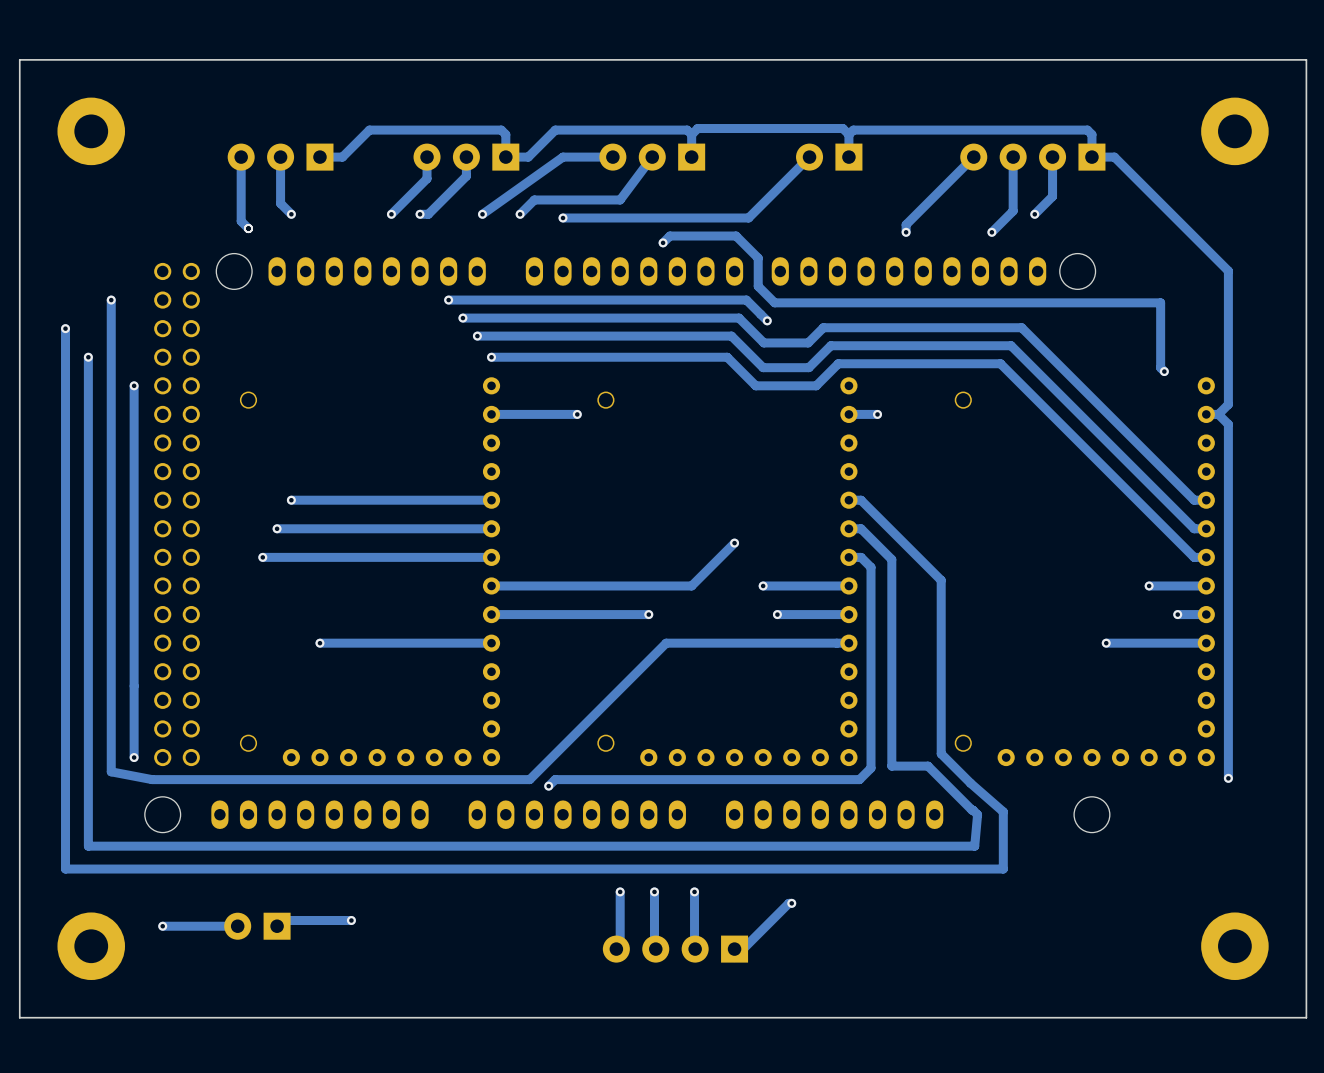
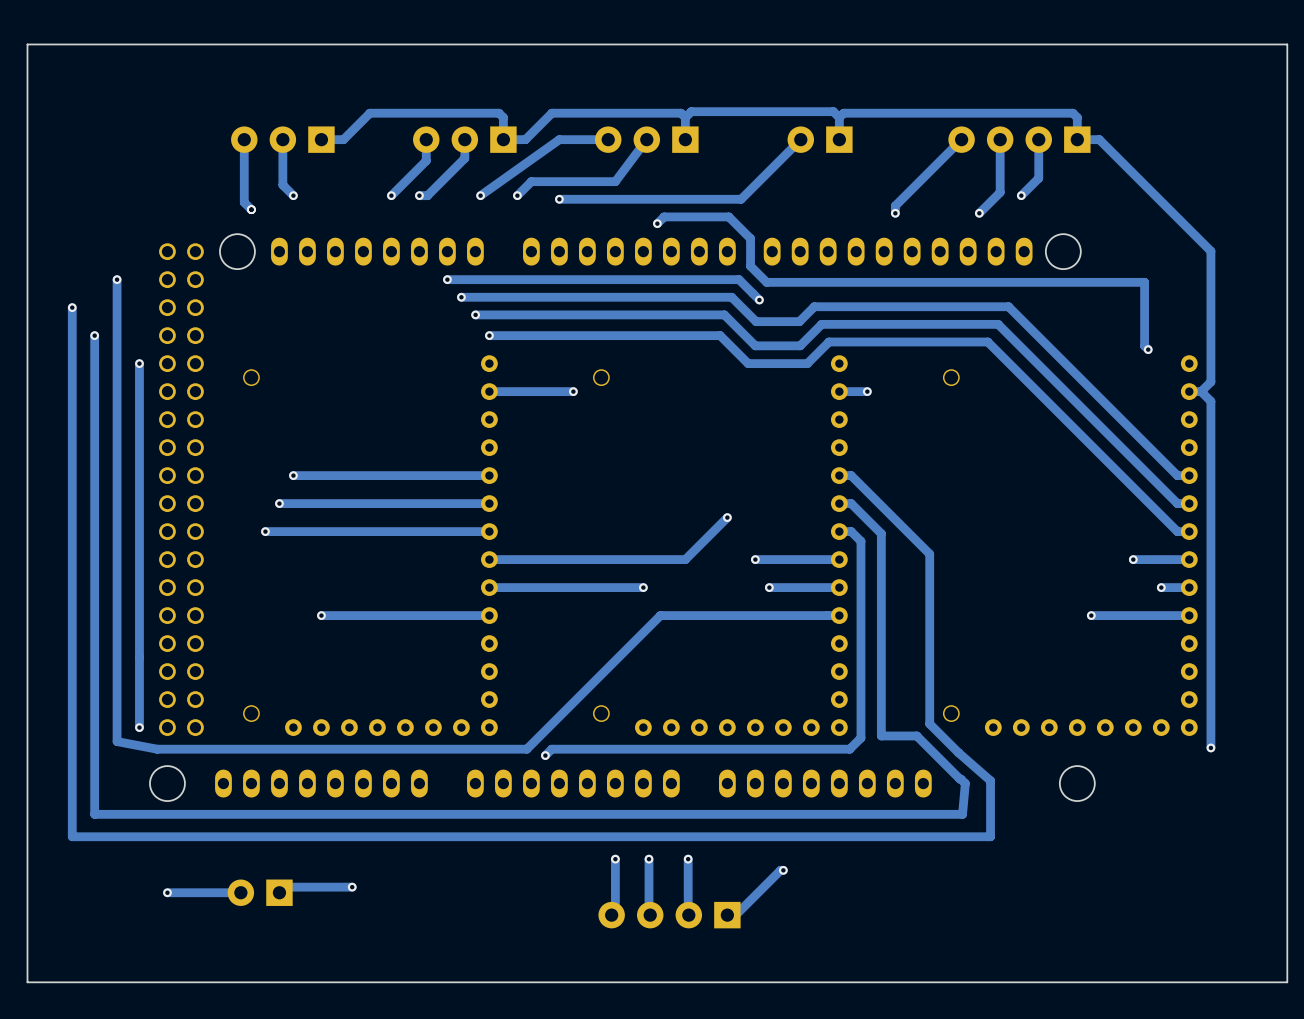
part: (91, 131) -> none
part: (1234, 131) -> none
part: (91, 946) -> none
part: (1234, 946) -> none

